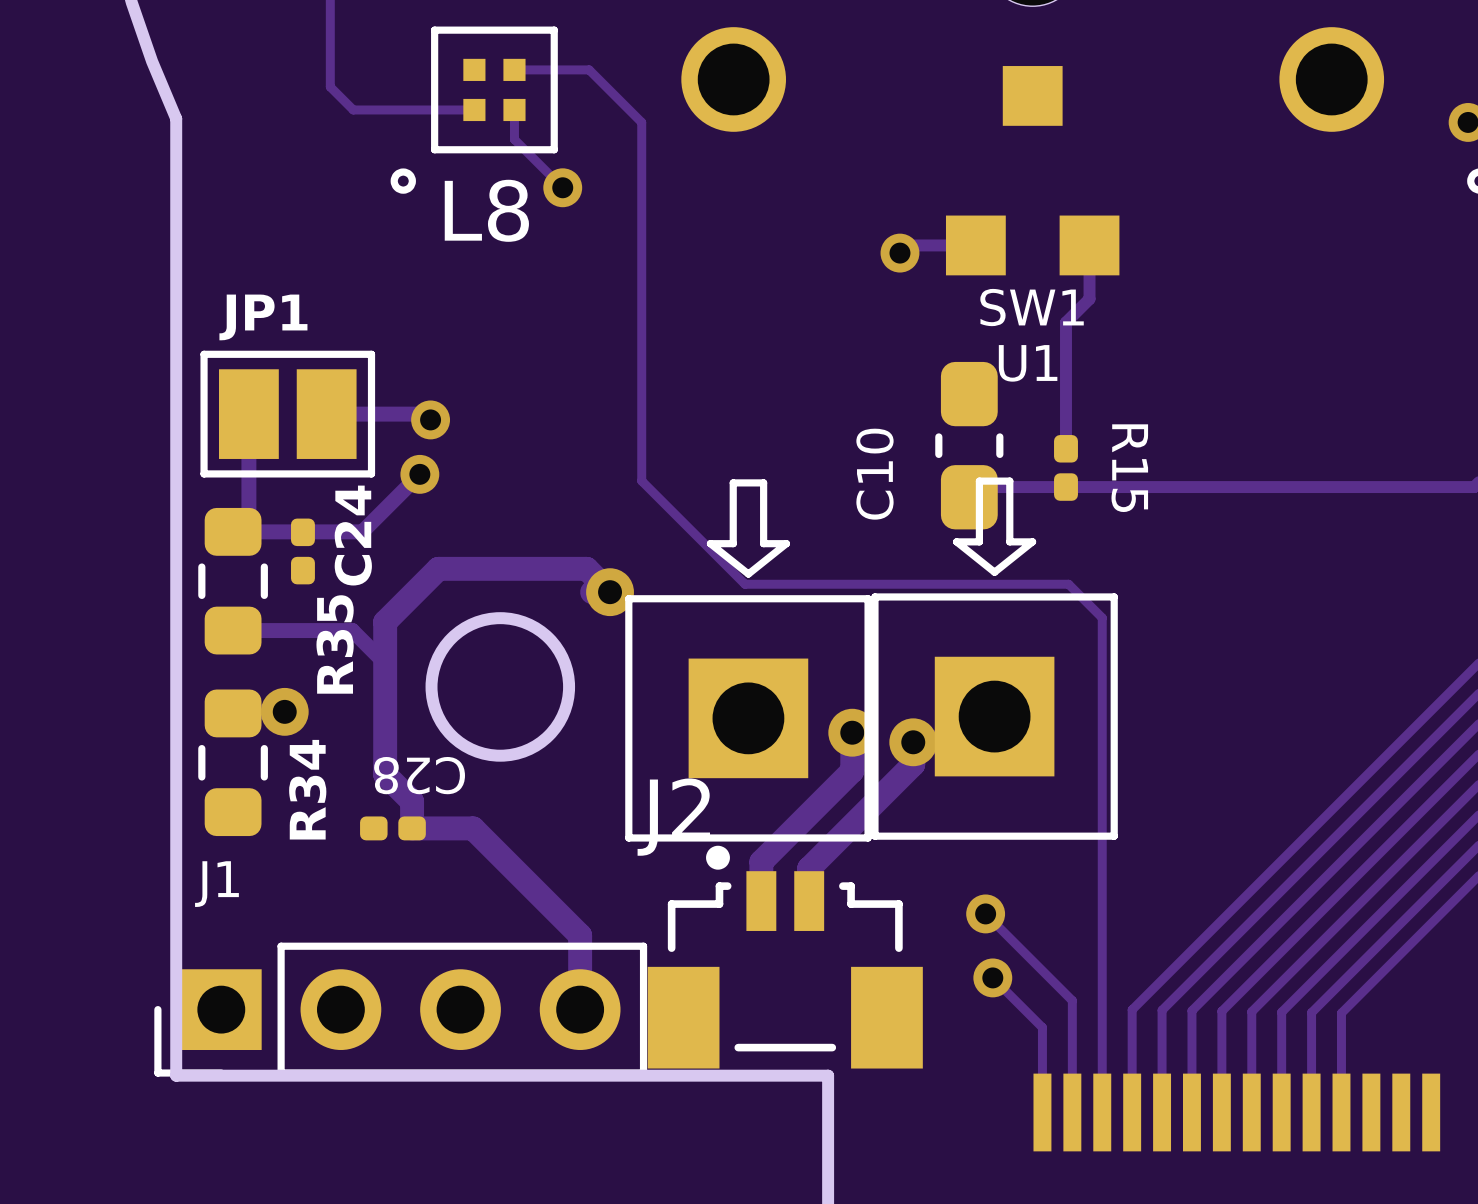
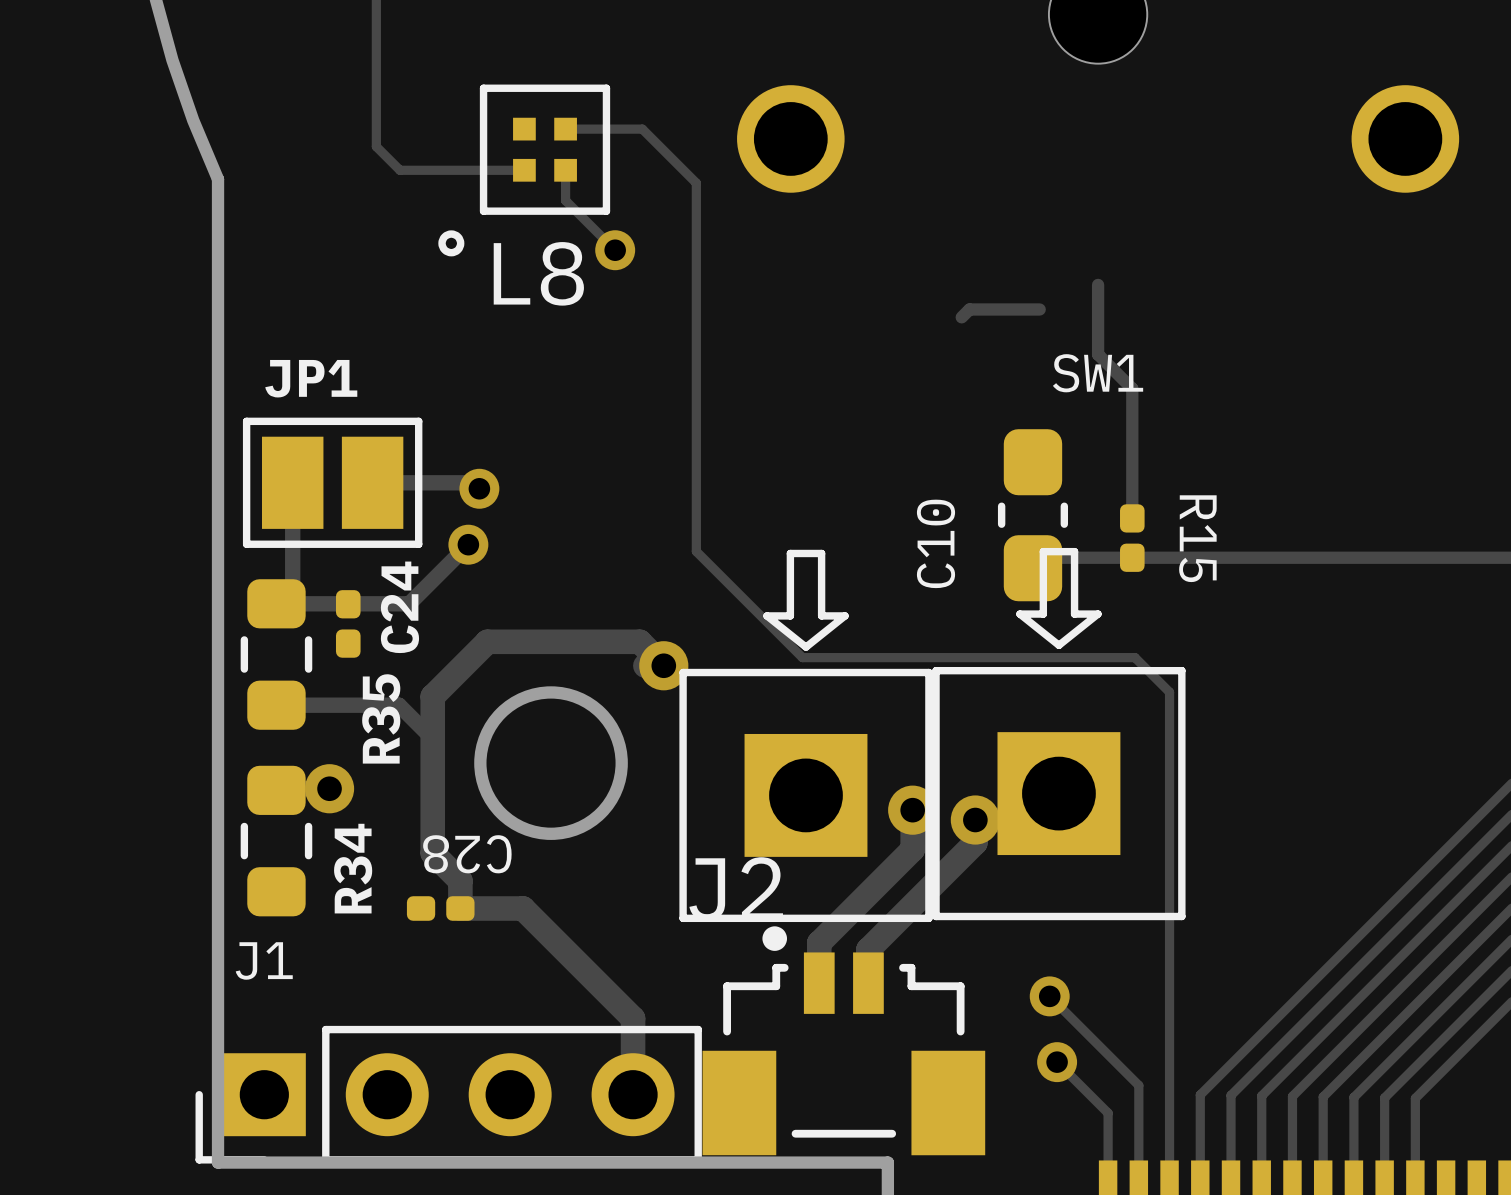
U1: (1032, 170) -> none
track: (1089, 245) (1089, 299) (1065, 322) -> (1098, 284) (1098, 354) (1132, 388)
via: (899, 253) -> none

